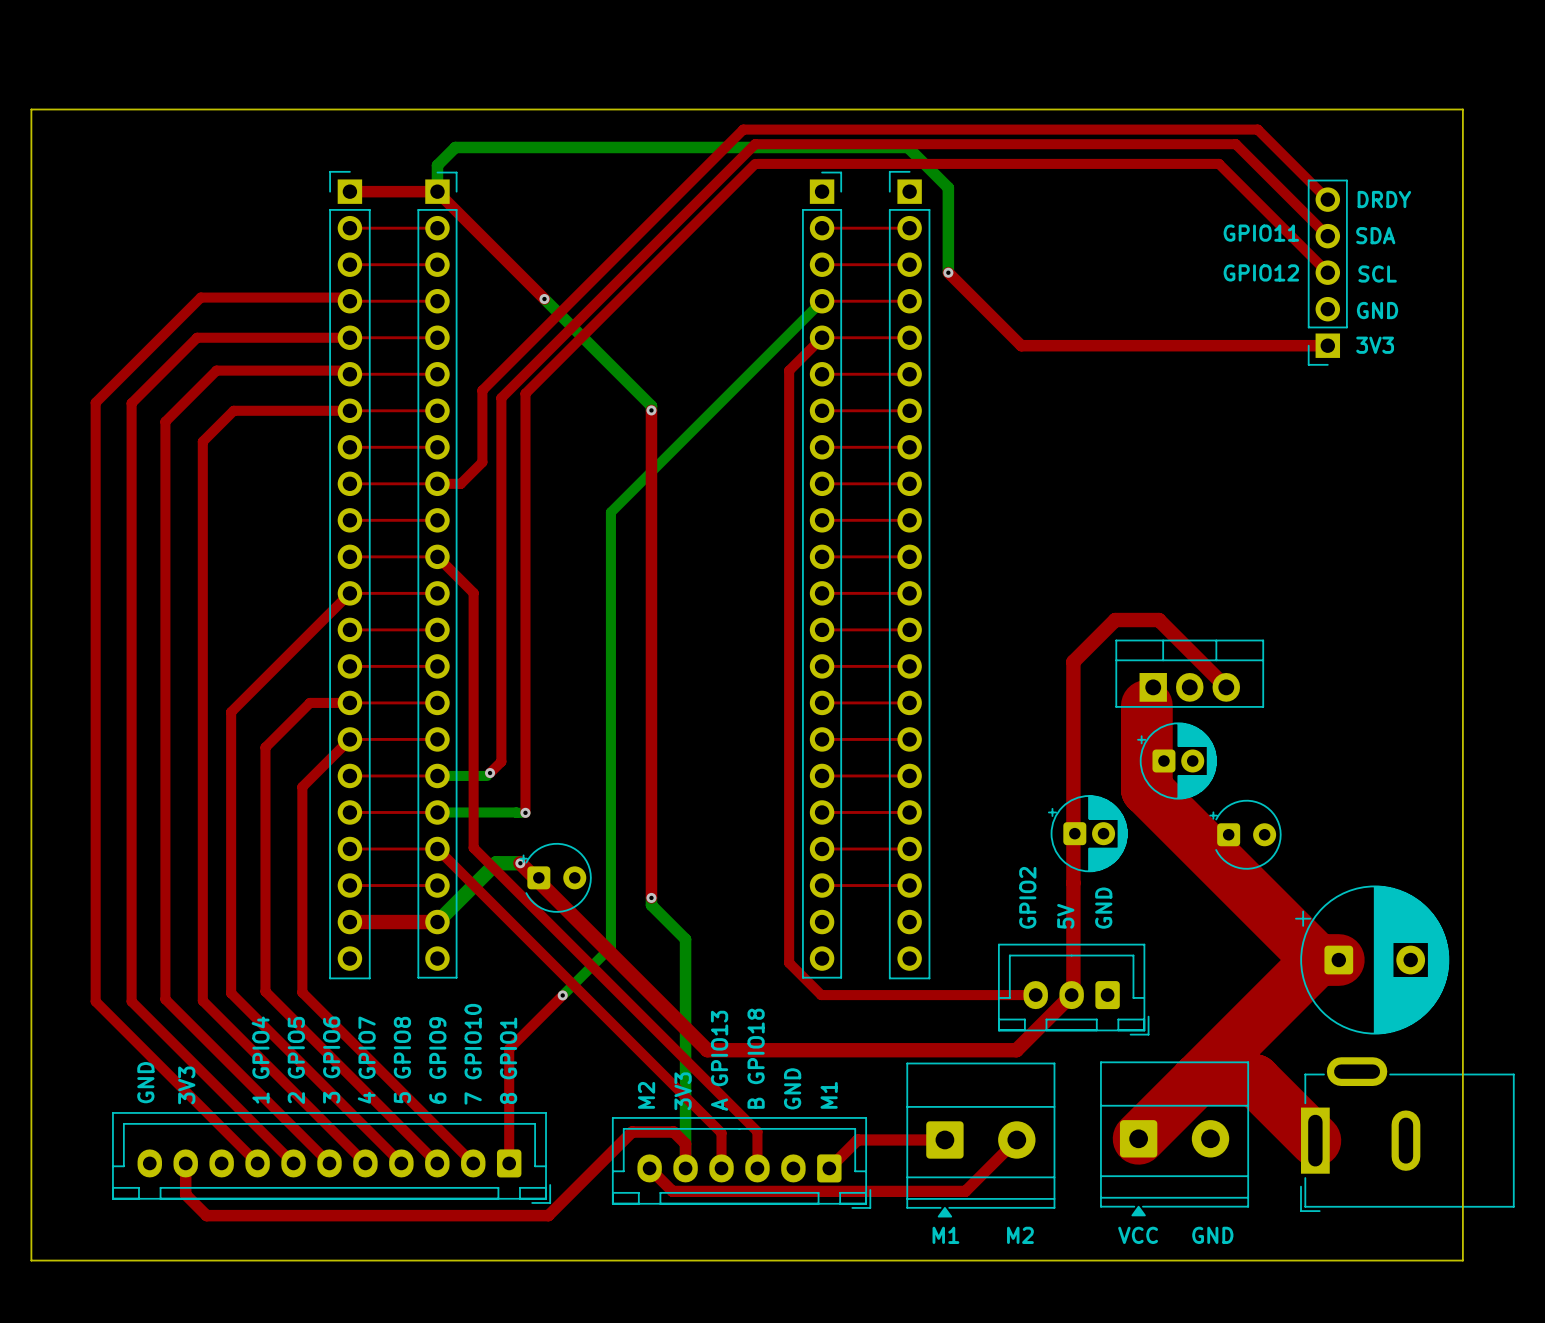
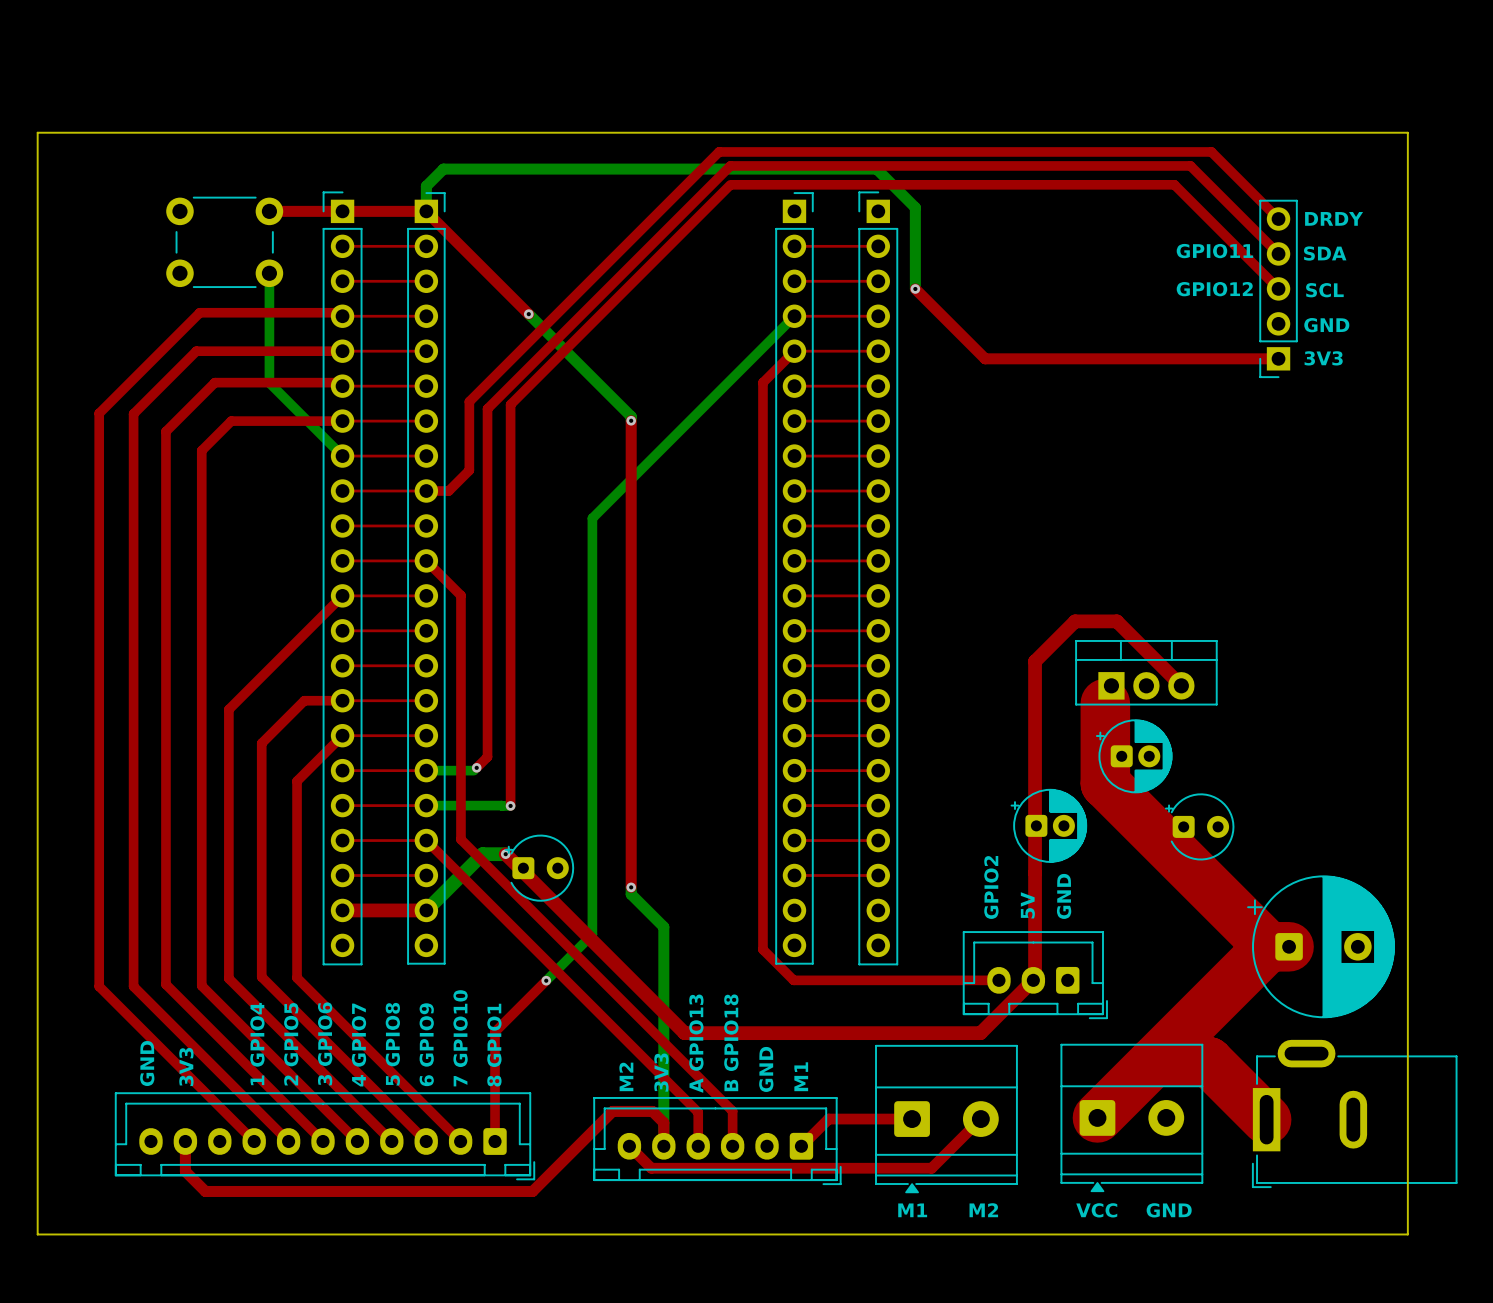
top track: none -> (269, 211) (342, 211)
part: none -> (224, 242)
bottom track: none -> (269, 273) (269, 382) (342, 456)

